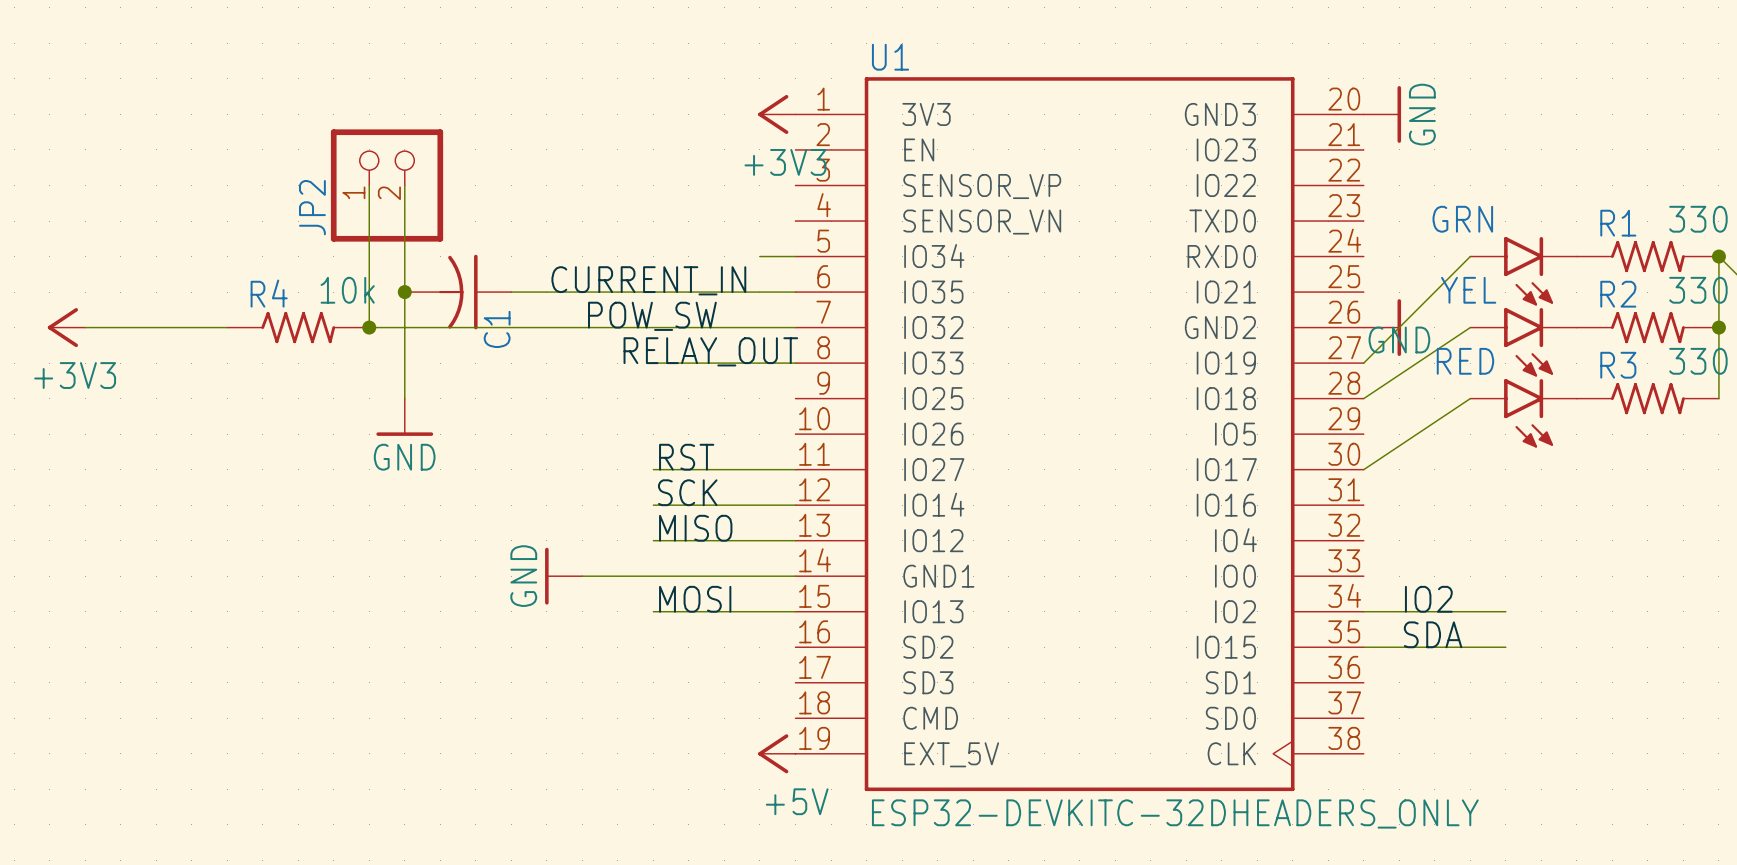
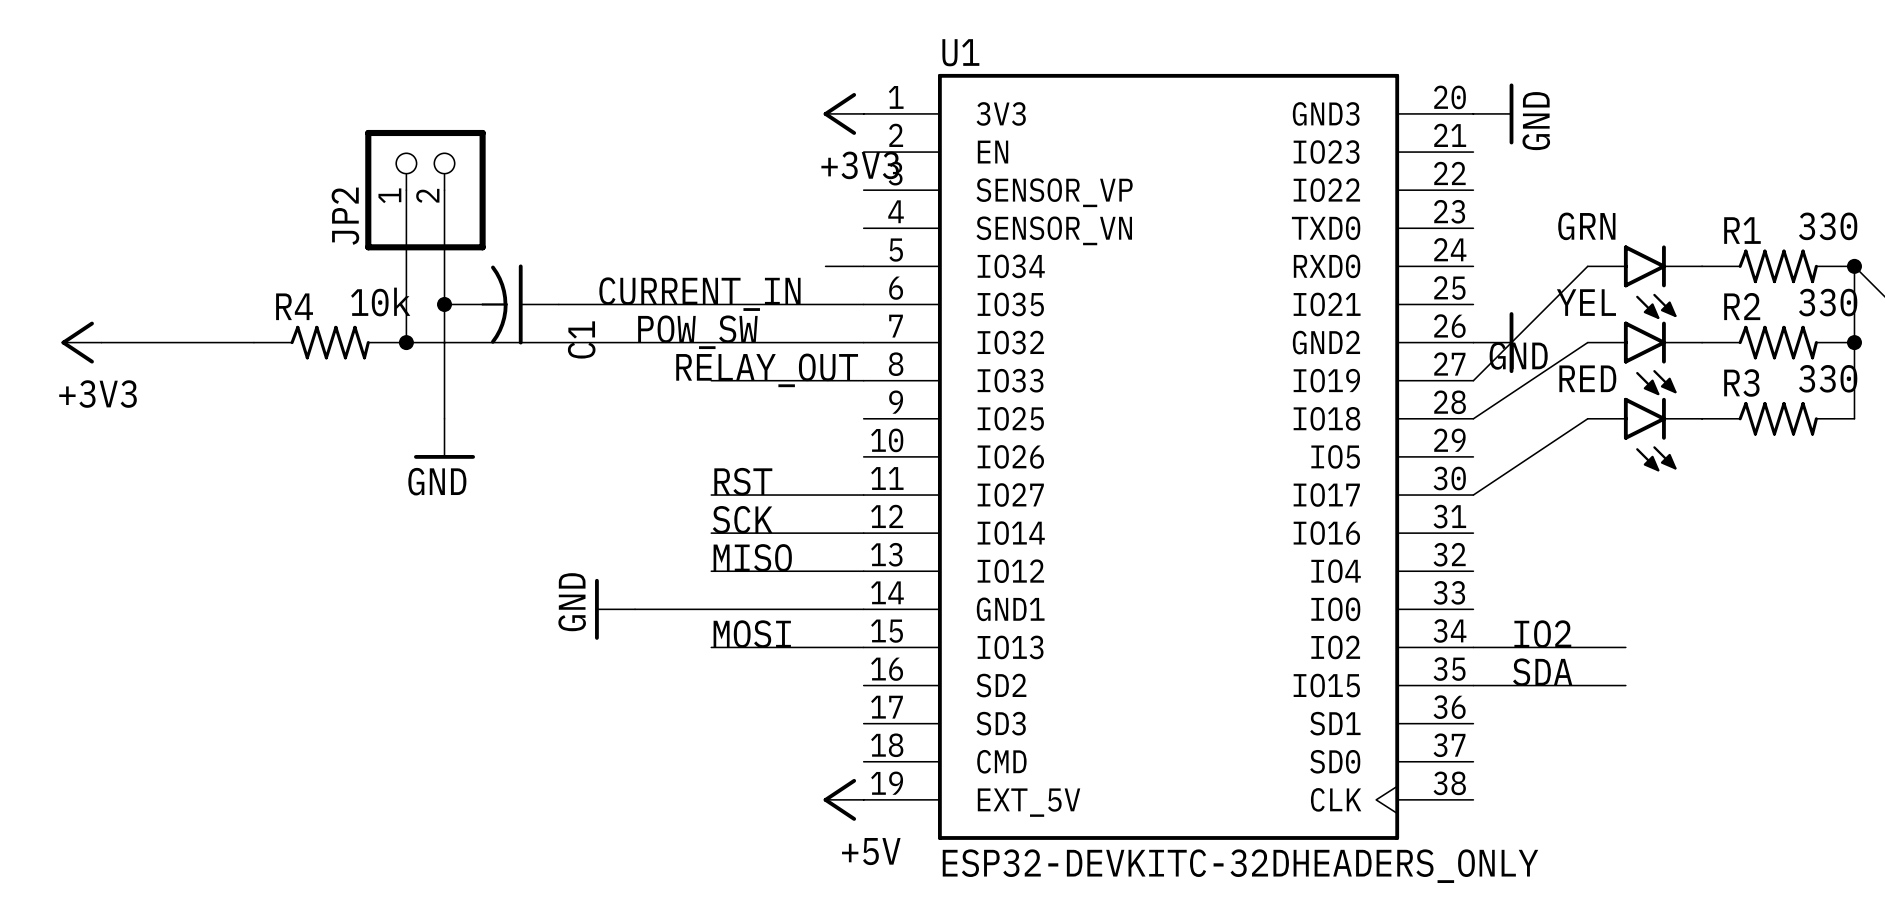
C1 name position: C1 (497, 329) -> C1 (581, 339)

